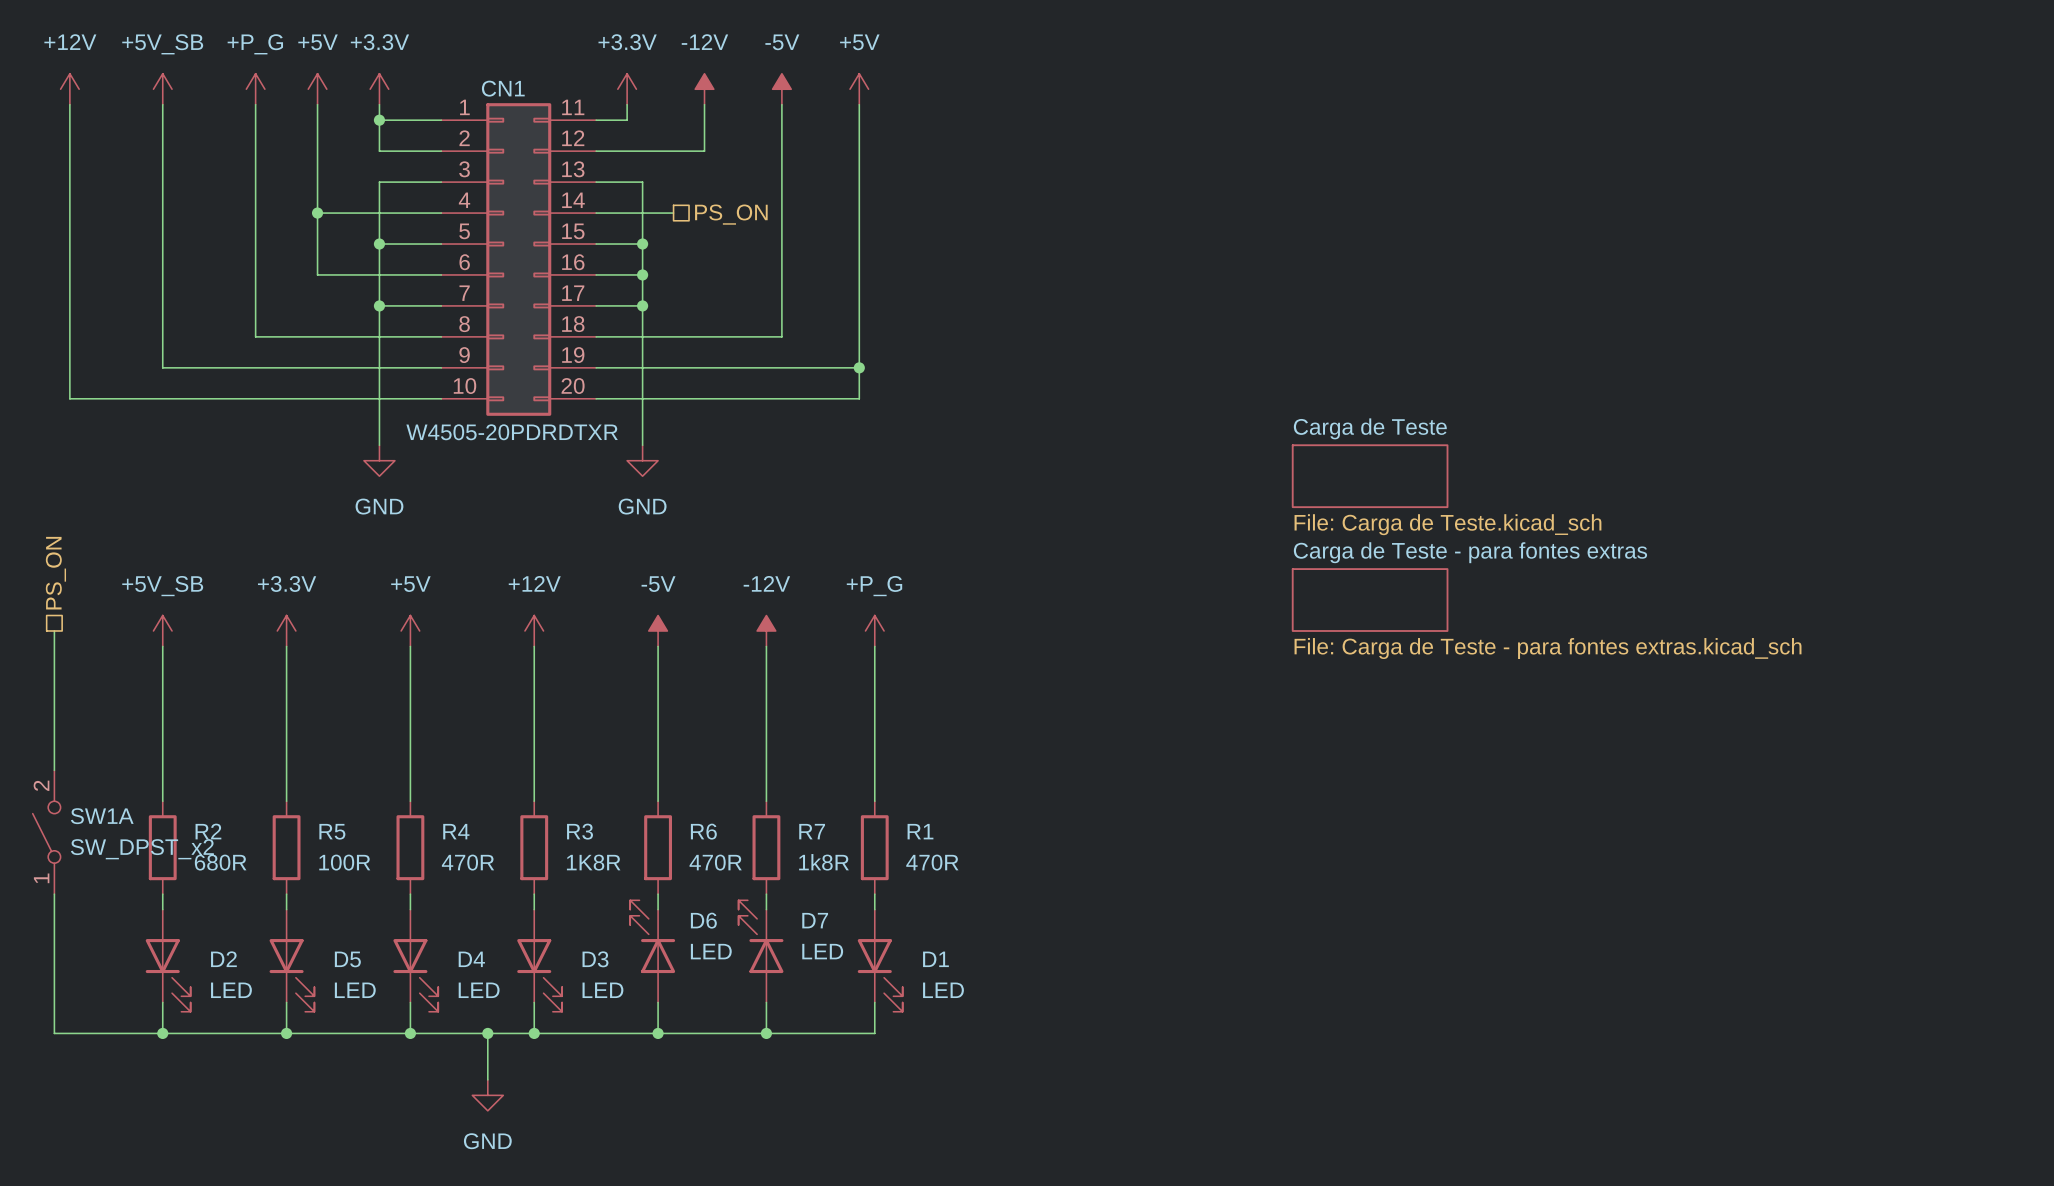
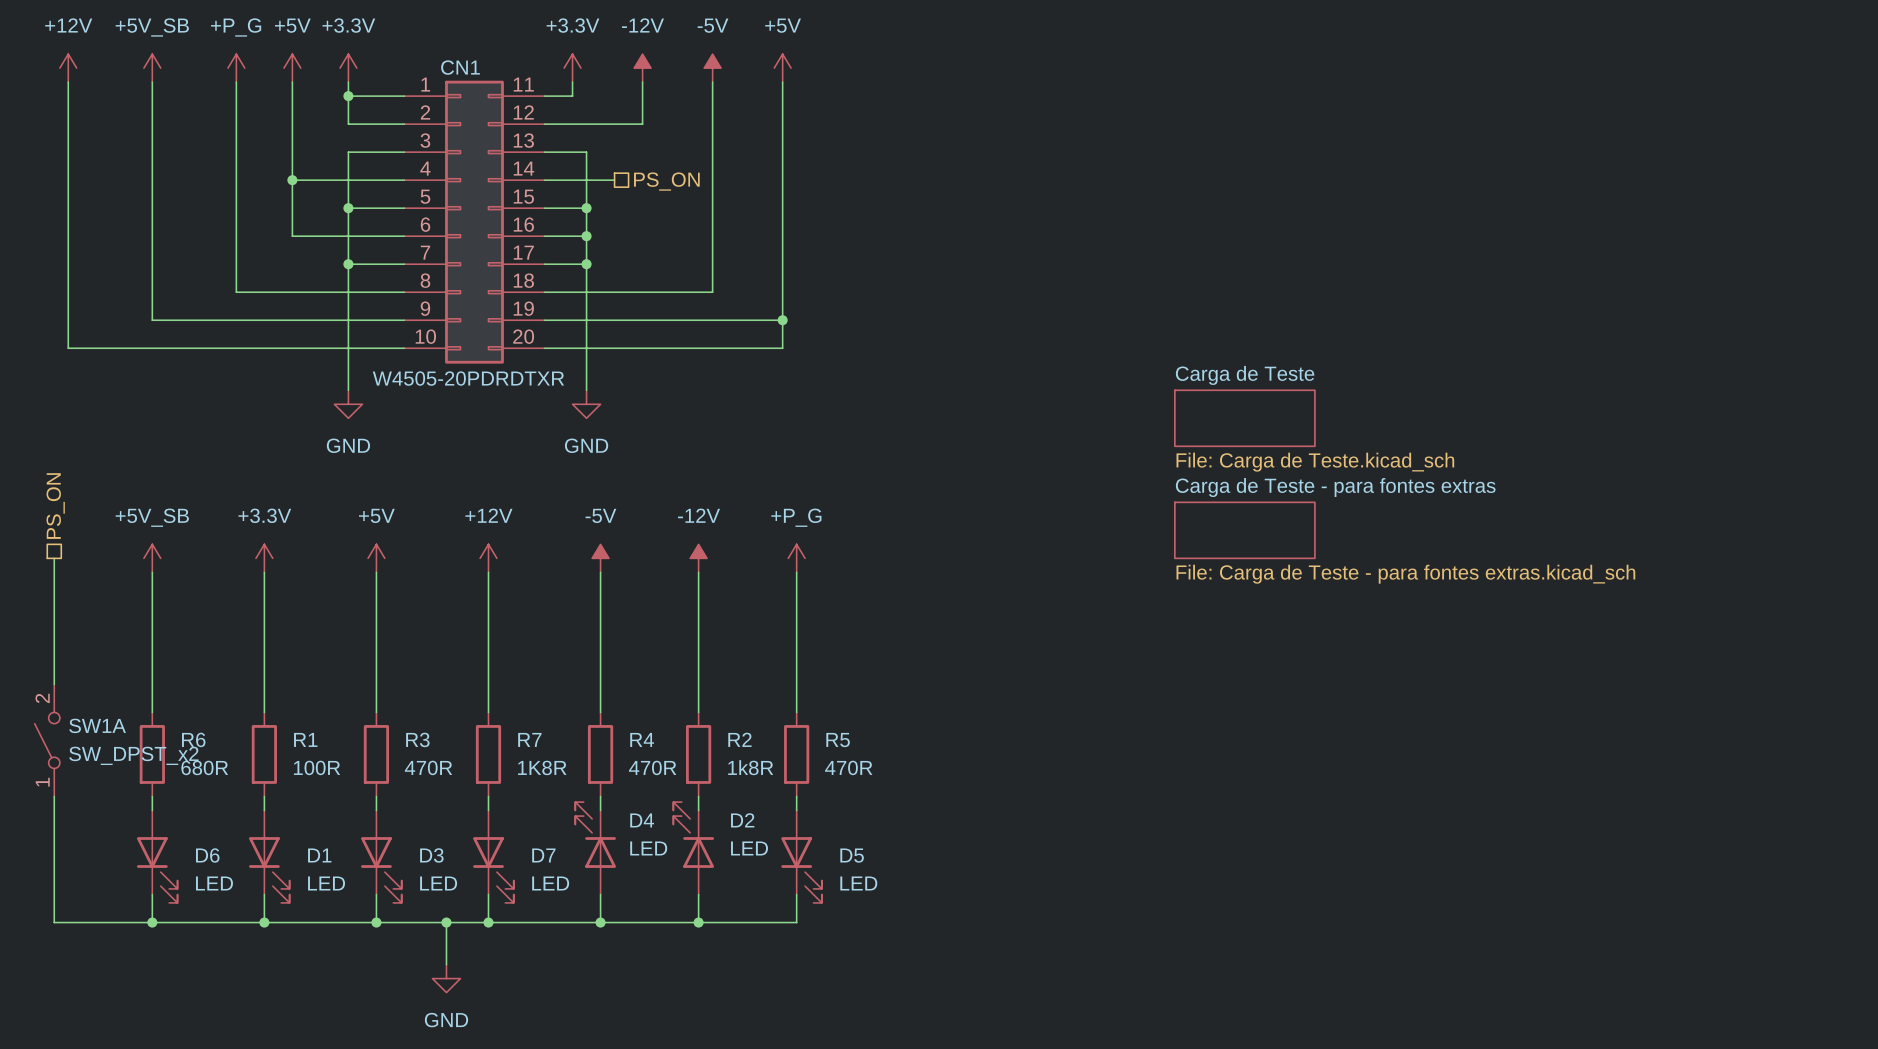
R2 name: R2 (208, 831) -> R6 (193, 739)
R5 name: R5 (332, 831) -> R1 (305, 739)
R4 name: R4 (456, 831) -> R3 (417, 739)
R3 name: R3 (580, 831) -> R7 (529, 739)
R6 name: R6 (703, 831) -> R4 (642, 739)
R7 name: R7 (812, 831) -> R2 (739, 739)
R1 name: R1 (920, 831) -> R5 (838, 740)
D6 name: D6 (703, 920) -> D4 (642, 820)
D7 name: D7 (815, 920) -> D2 (742, 820)
D2 name: D2 (223, 959) -> D6 (207, 855)
D5 name: D5 (347, 959) -> D1 (319, 855)
D4 name: D4 (471, 959) -> D3 (431, 855)
D3 name: D3 (595, 959) -> D7 (543, 855)
D1 name: D1 (935, 959) -> D5 (852, 855)

